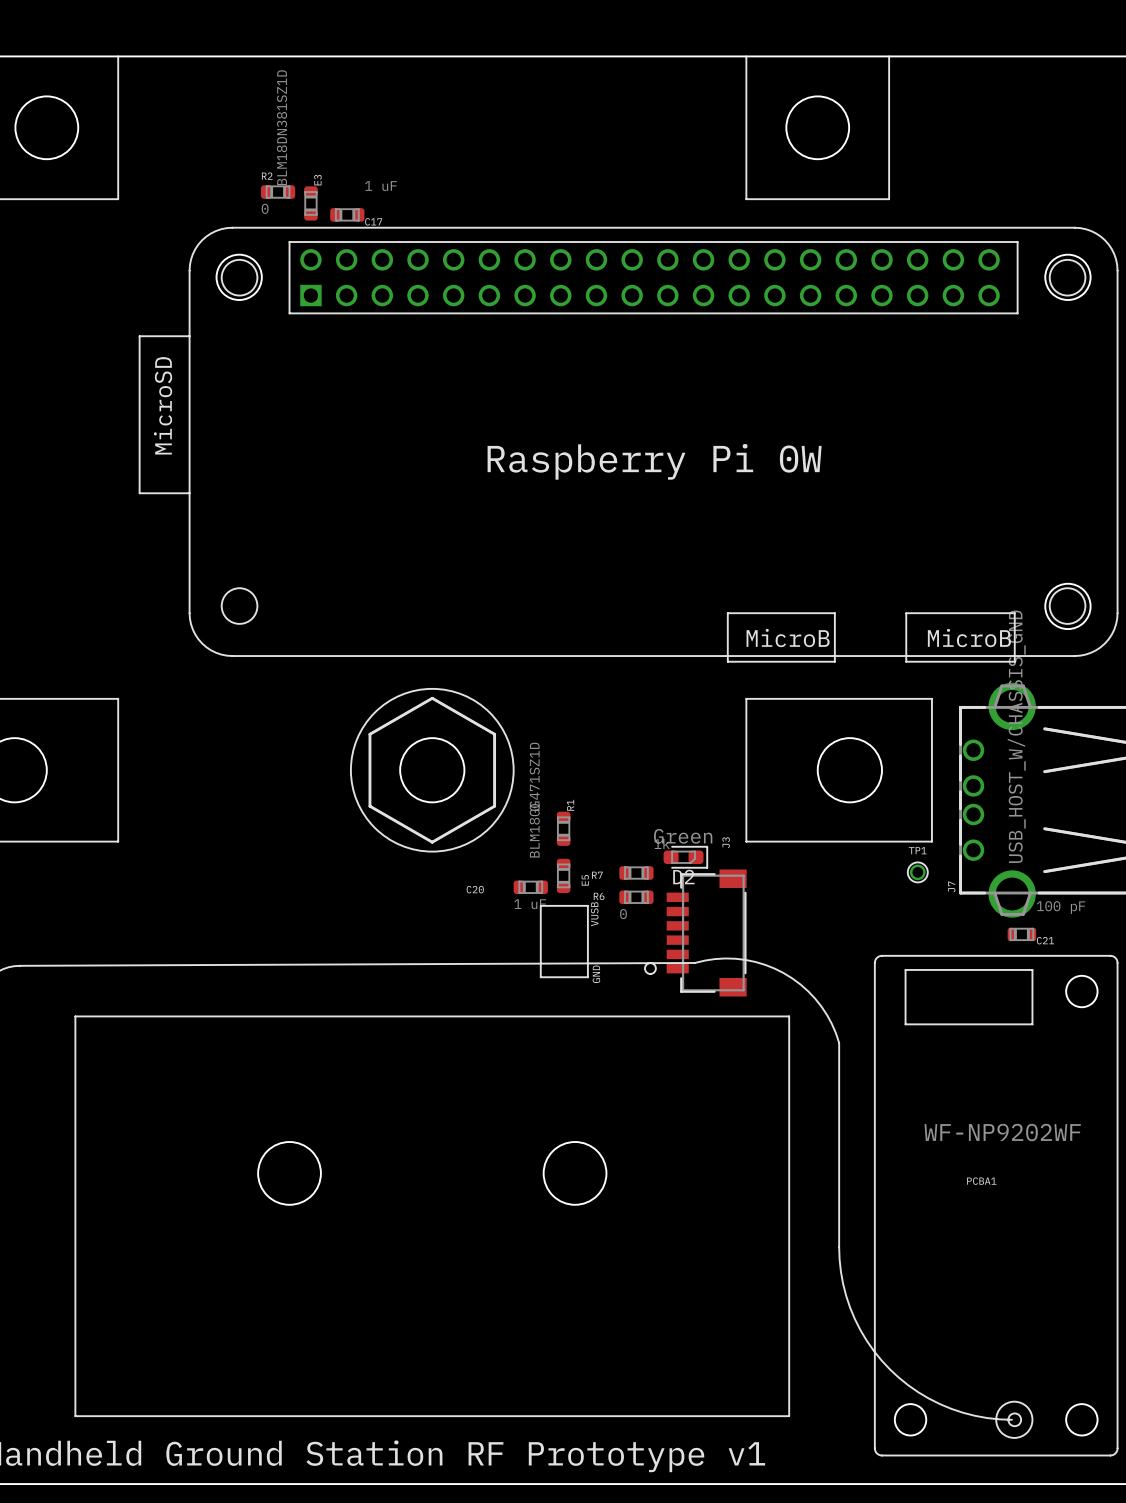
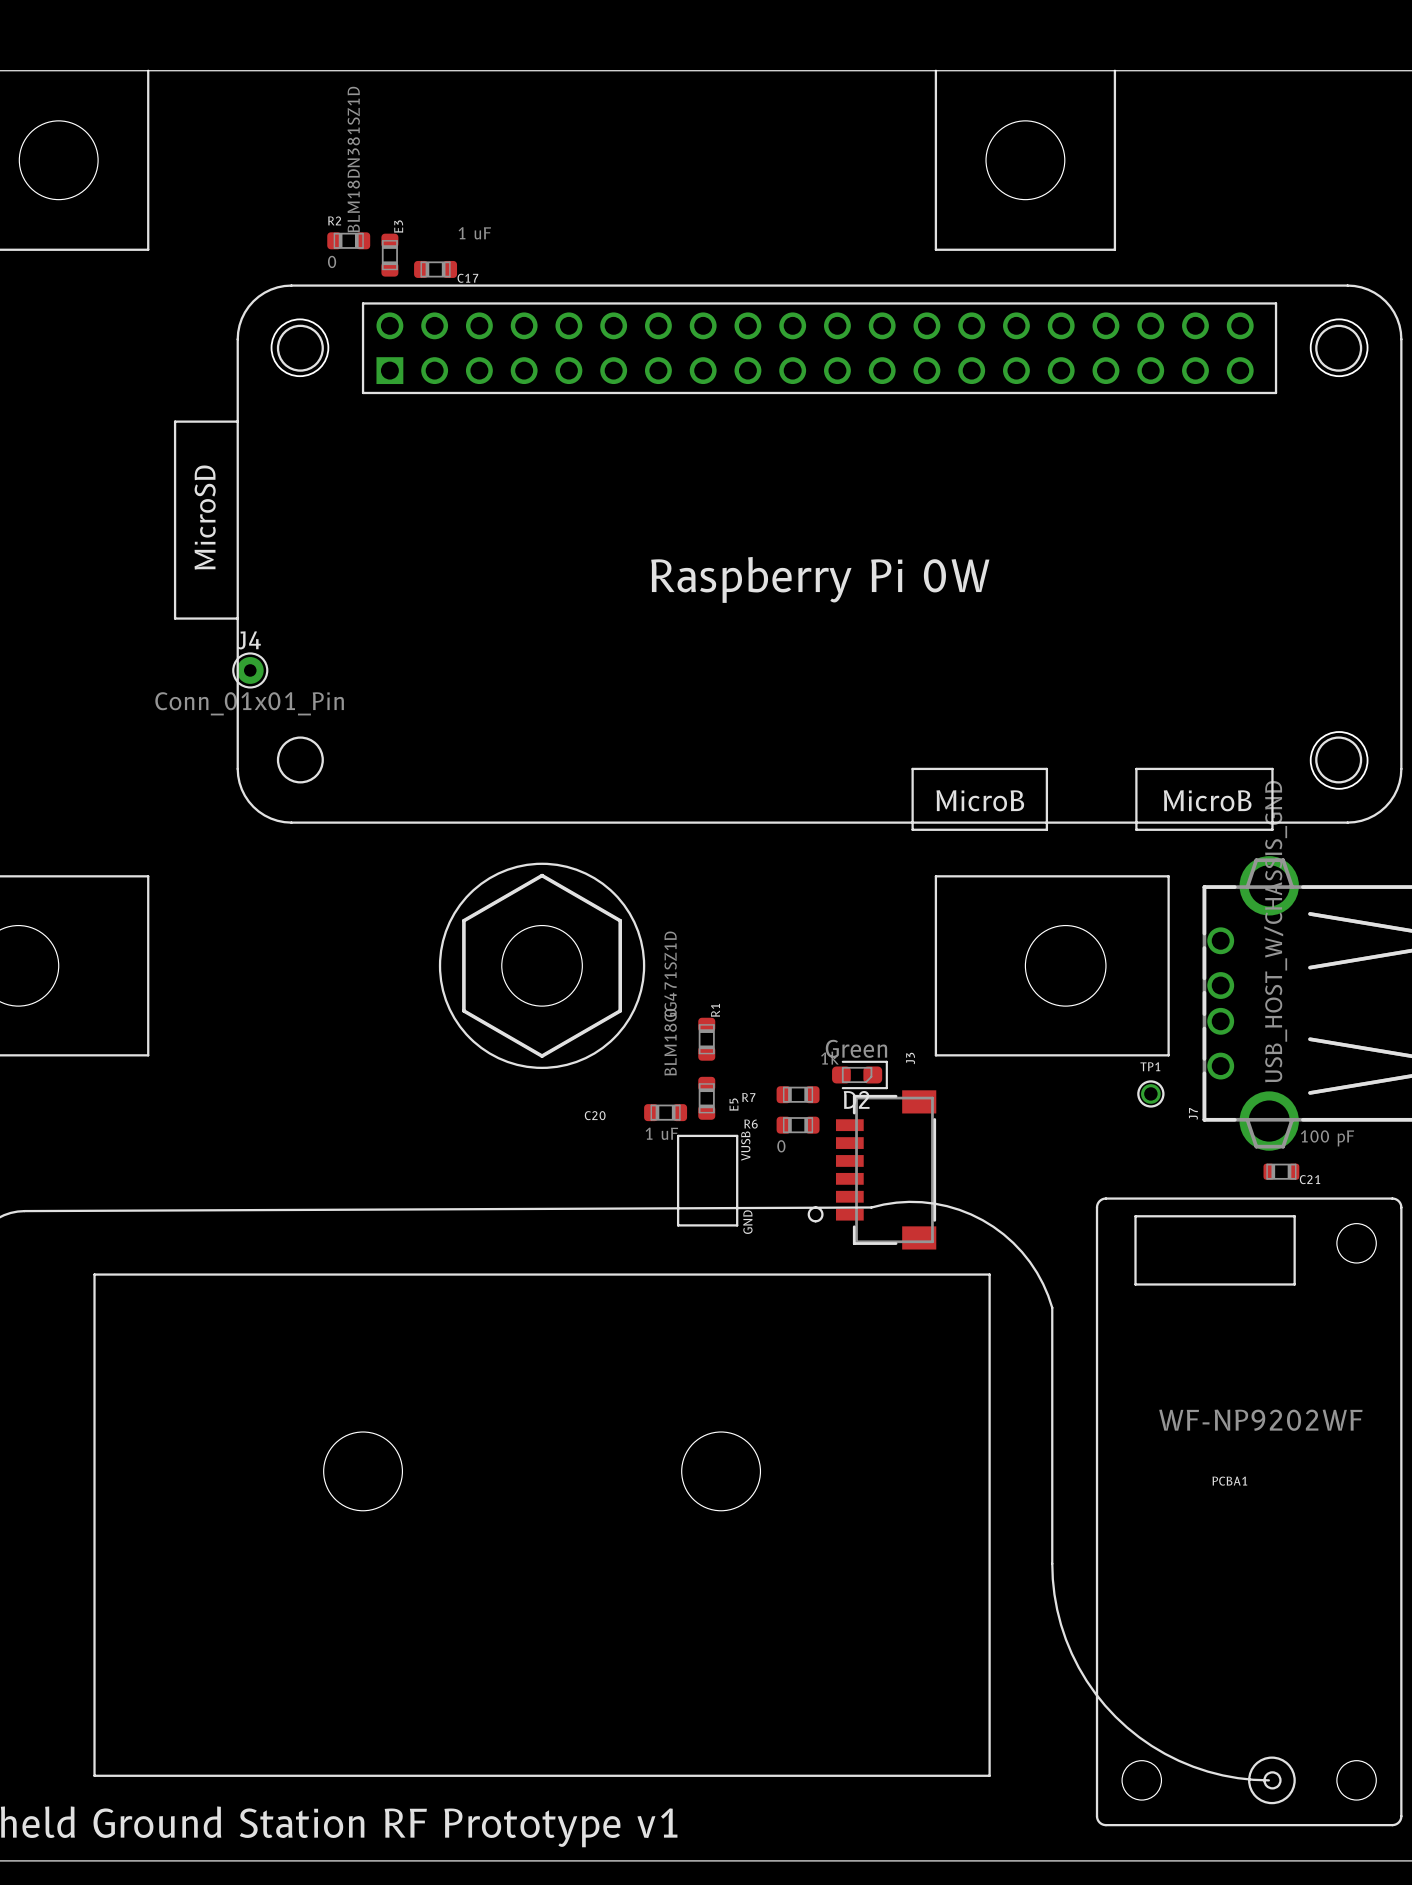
J4: none -> Conn_01x01_Pin (250, 670)

